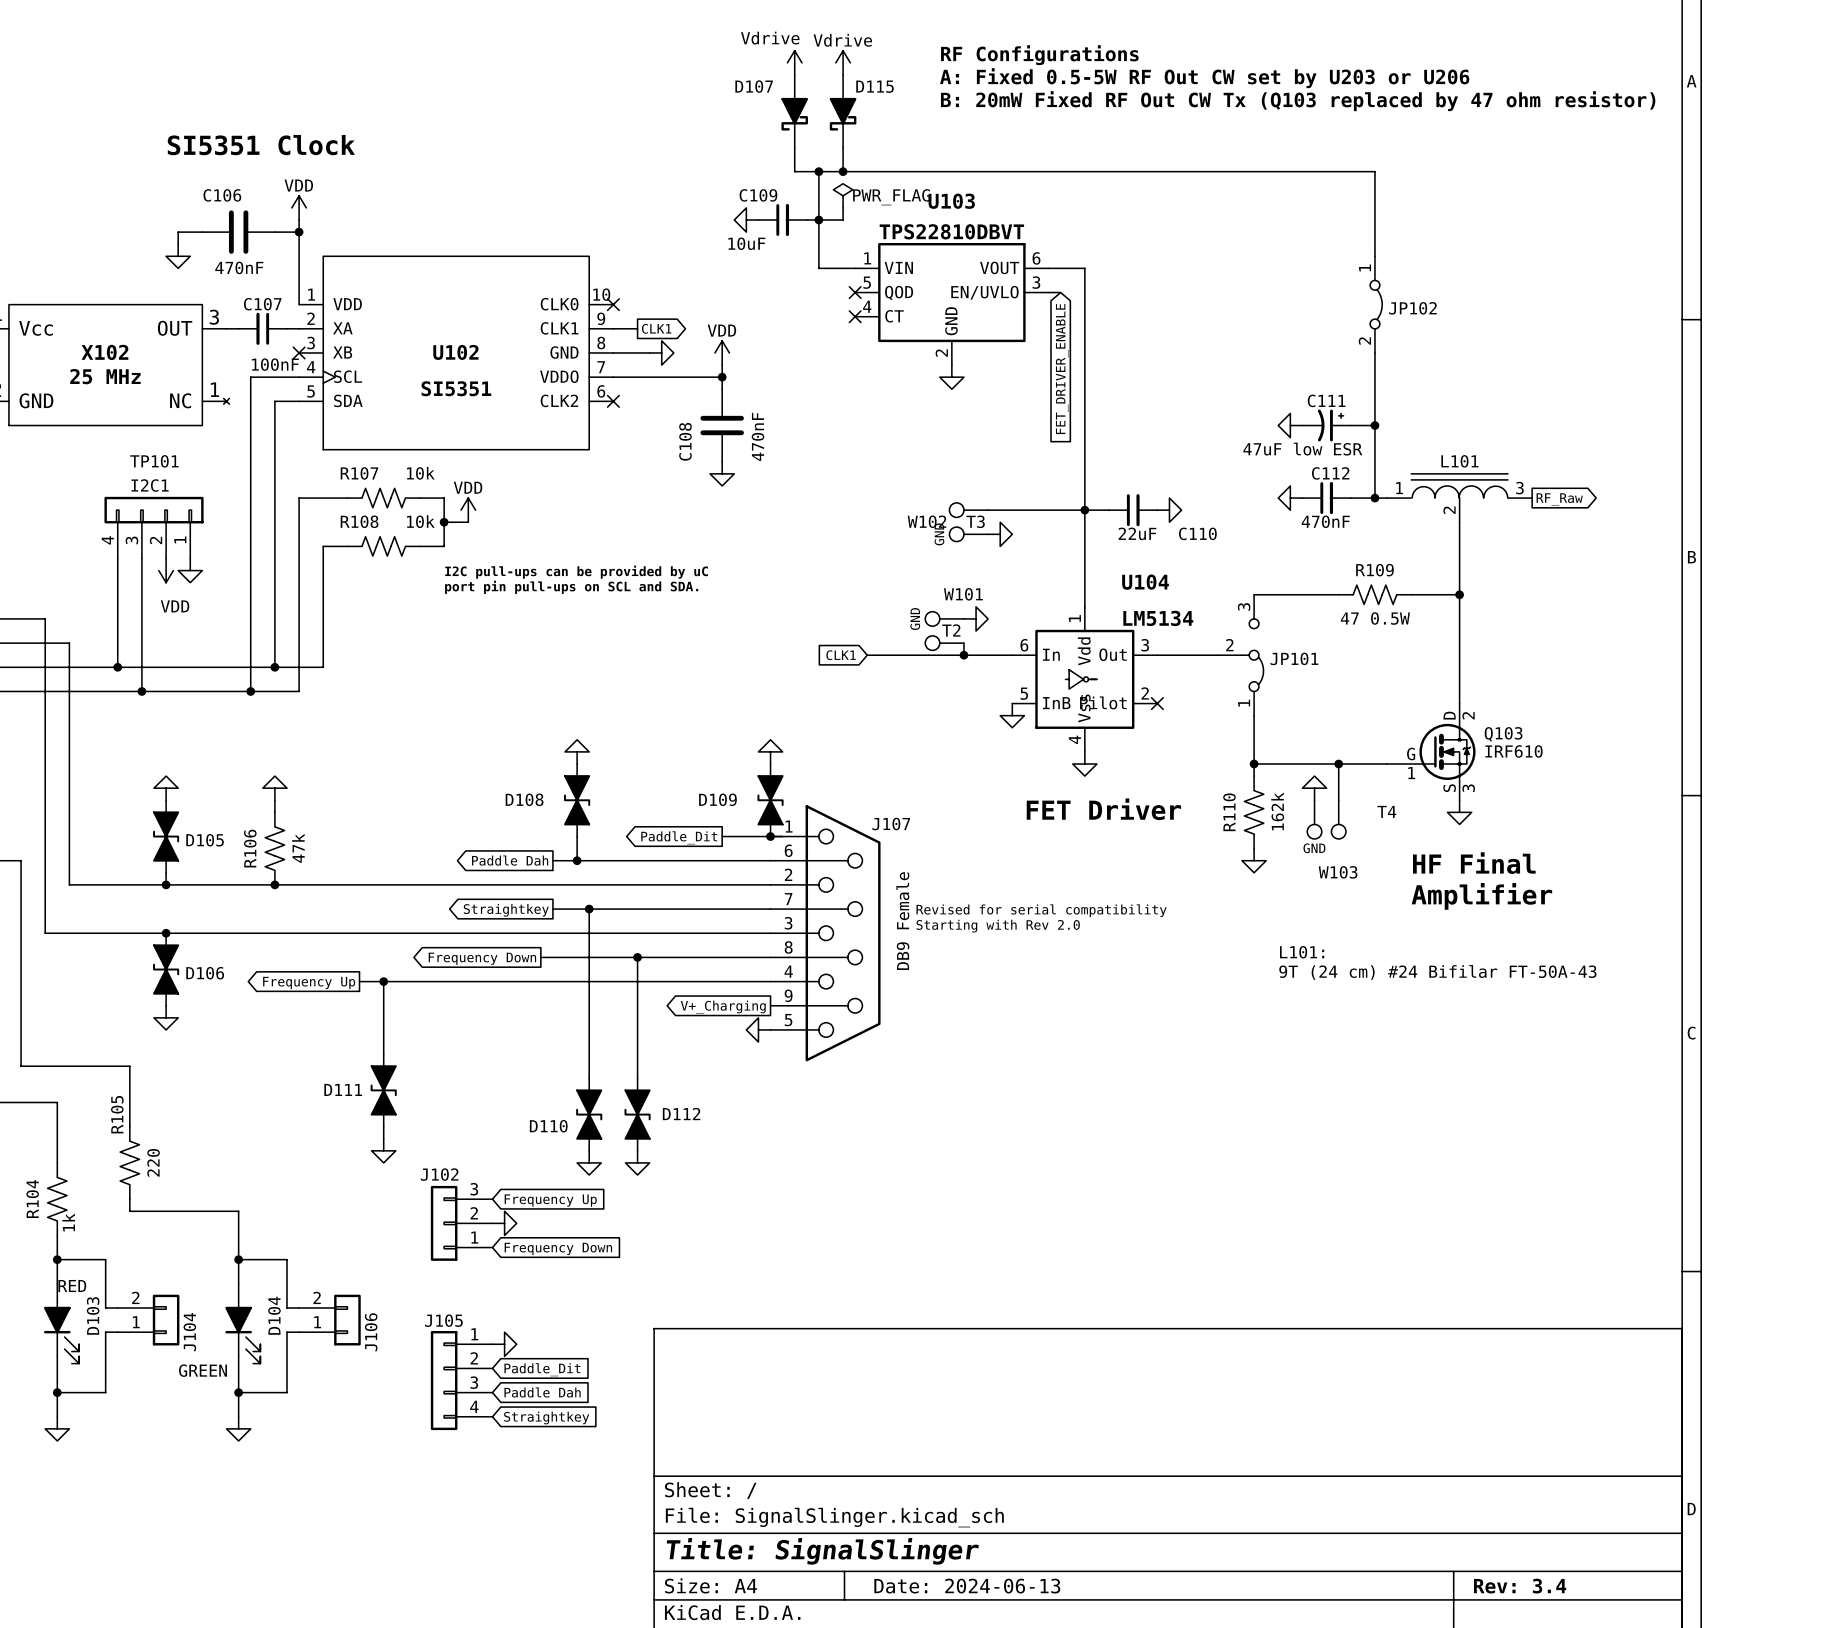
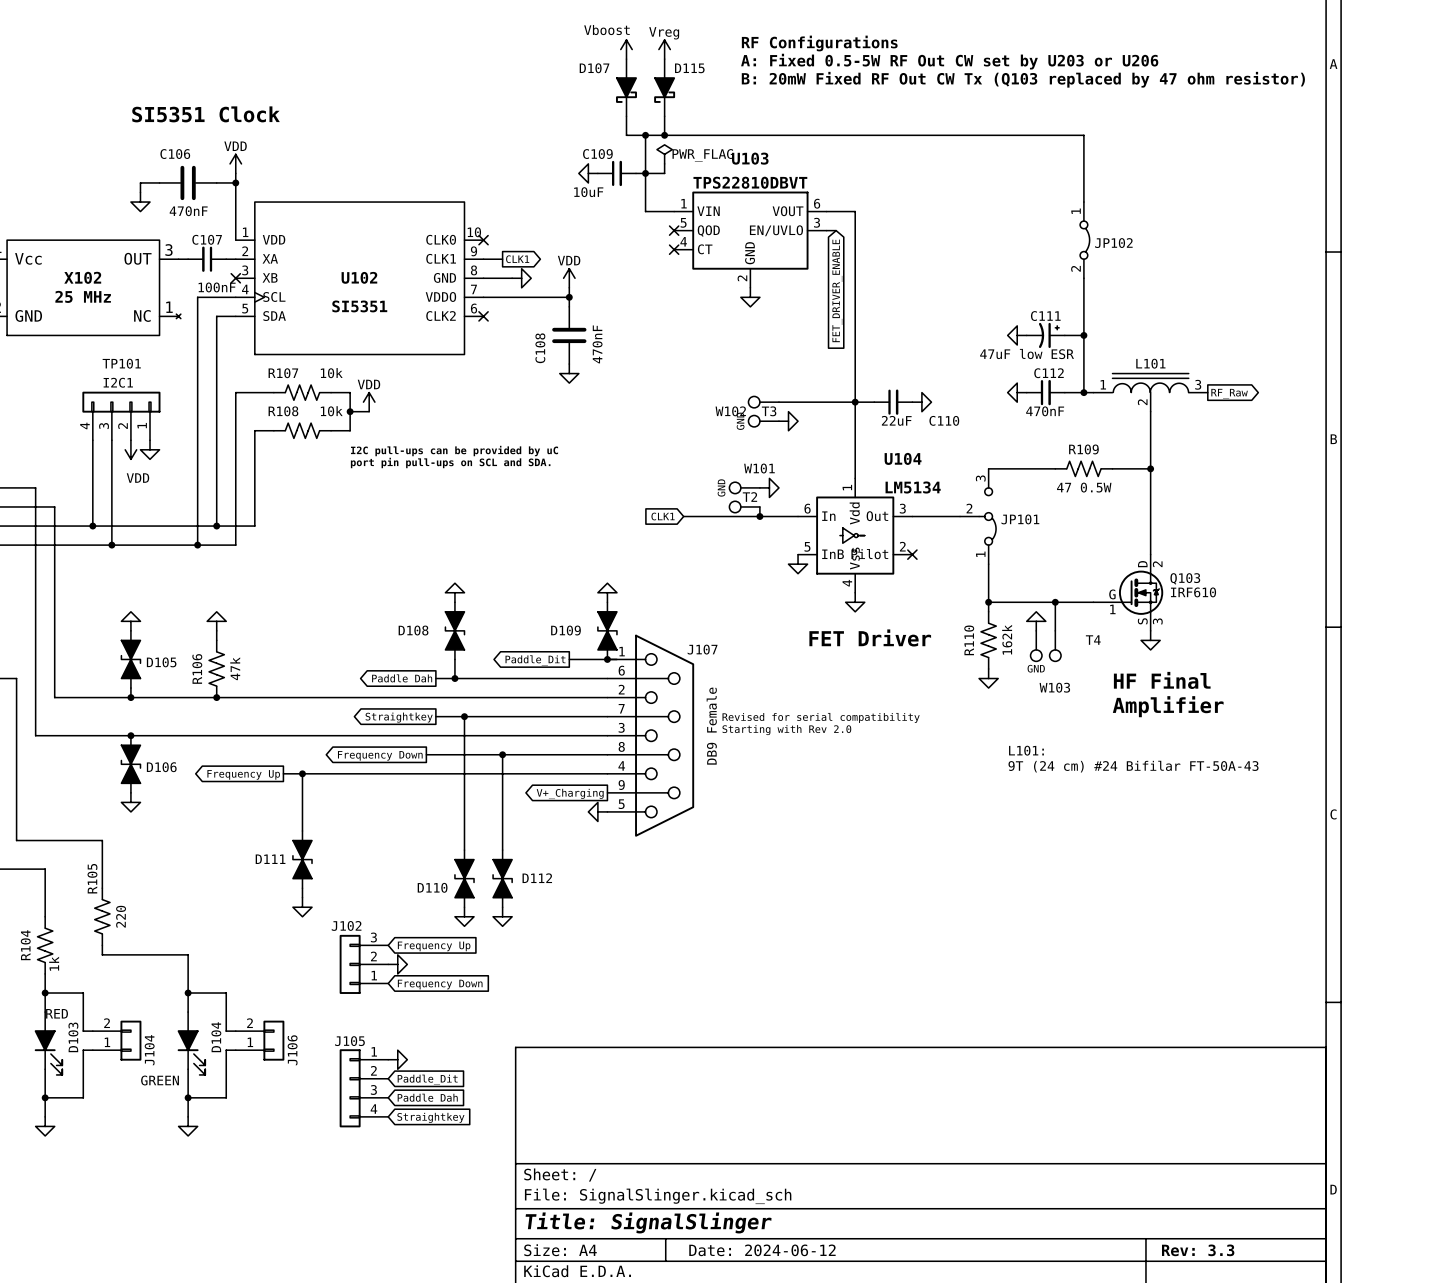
power symbol: Vdrive (794, 62) -> Vboost (626, 49)
power symbol: Vdrive (843, 62) -> Vreg (664, 49)
title block: Date: 2024-06-13 (967, 1586) -> Date: 2024-06-12 (762, 1250)
title block: Rev: 3.4 (1520, 1586) -> Rev: 3.3 (1198, 1250)

